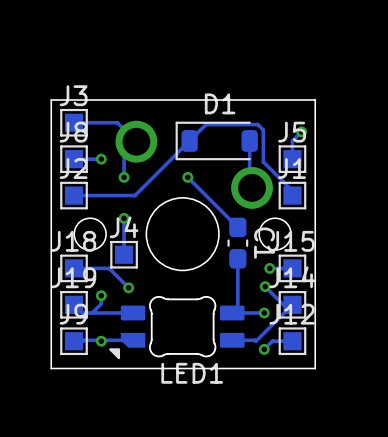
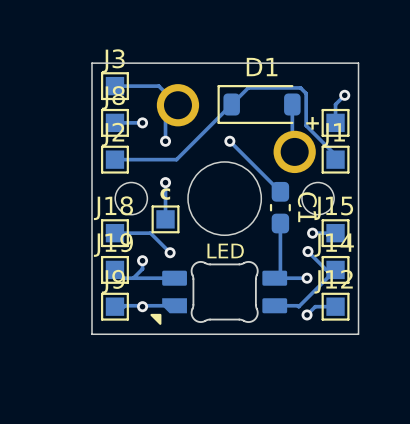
J5 name: J5 (292, 132) -> + (312, 123)
J4 name: J4 (124, 227) -> c (165, 194)
LED1 name: LED1 (192, 373) -> LED (225, 250)

